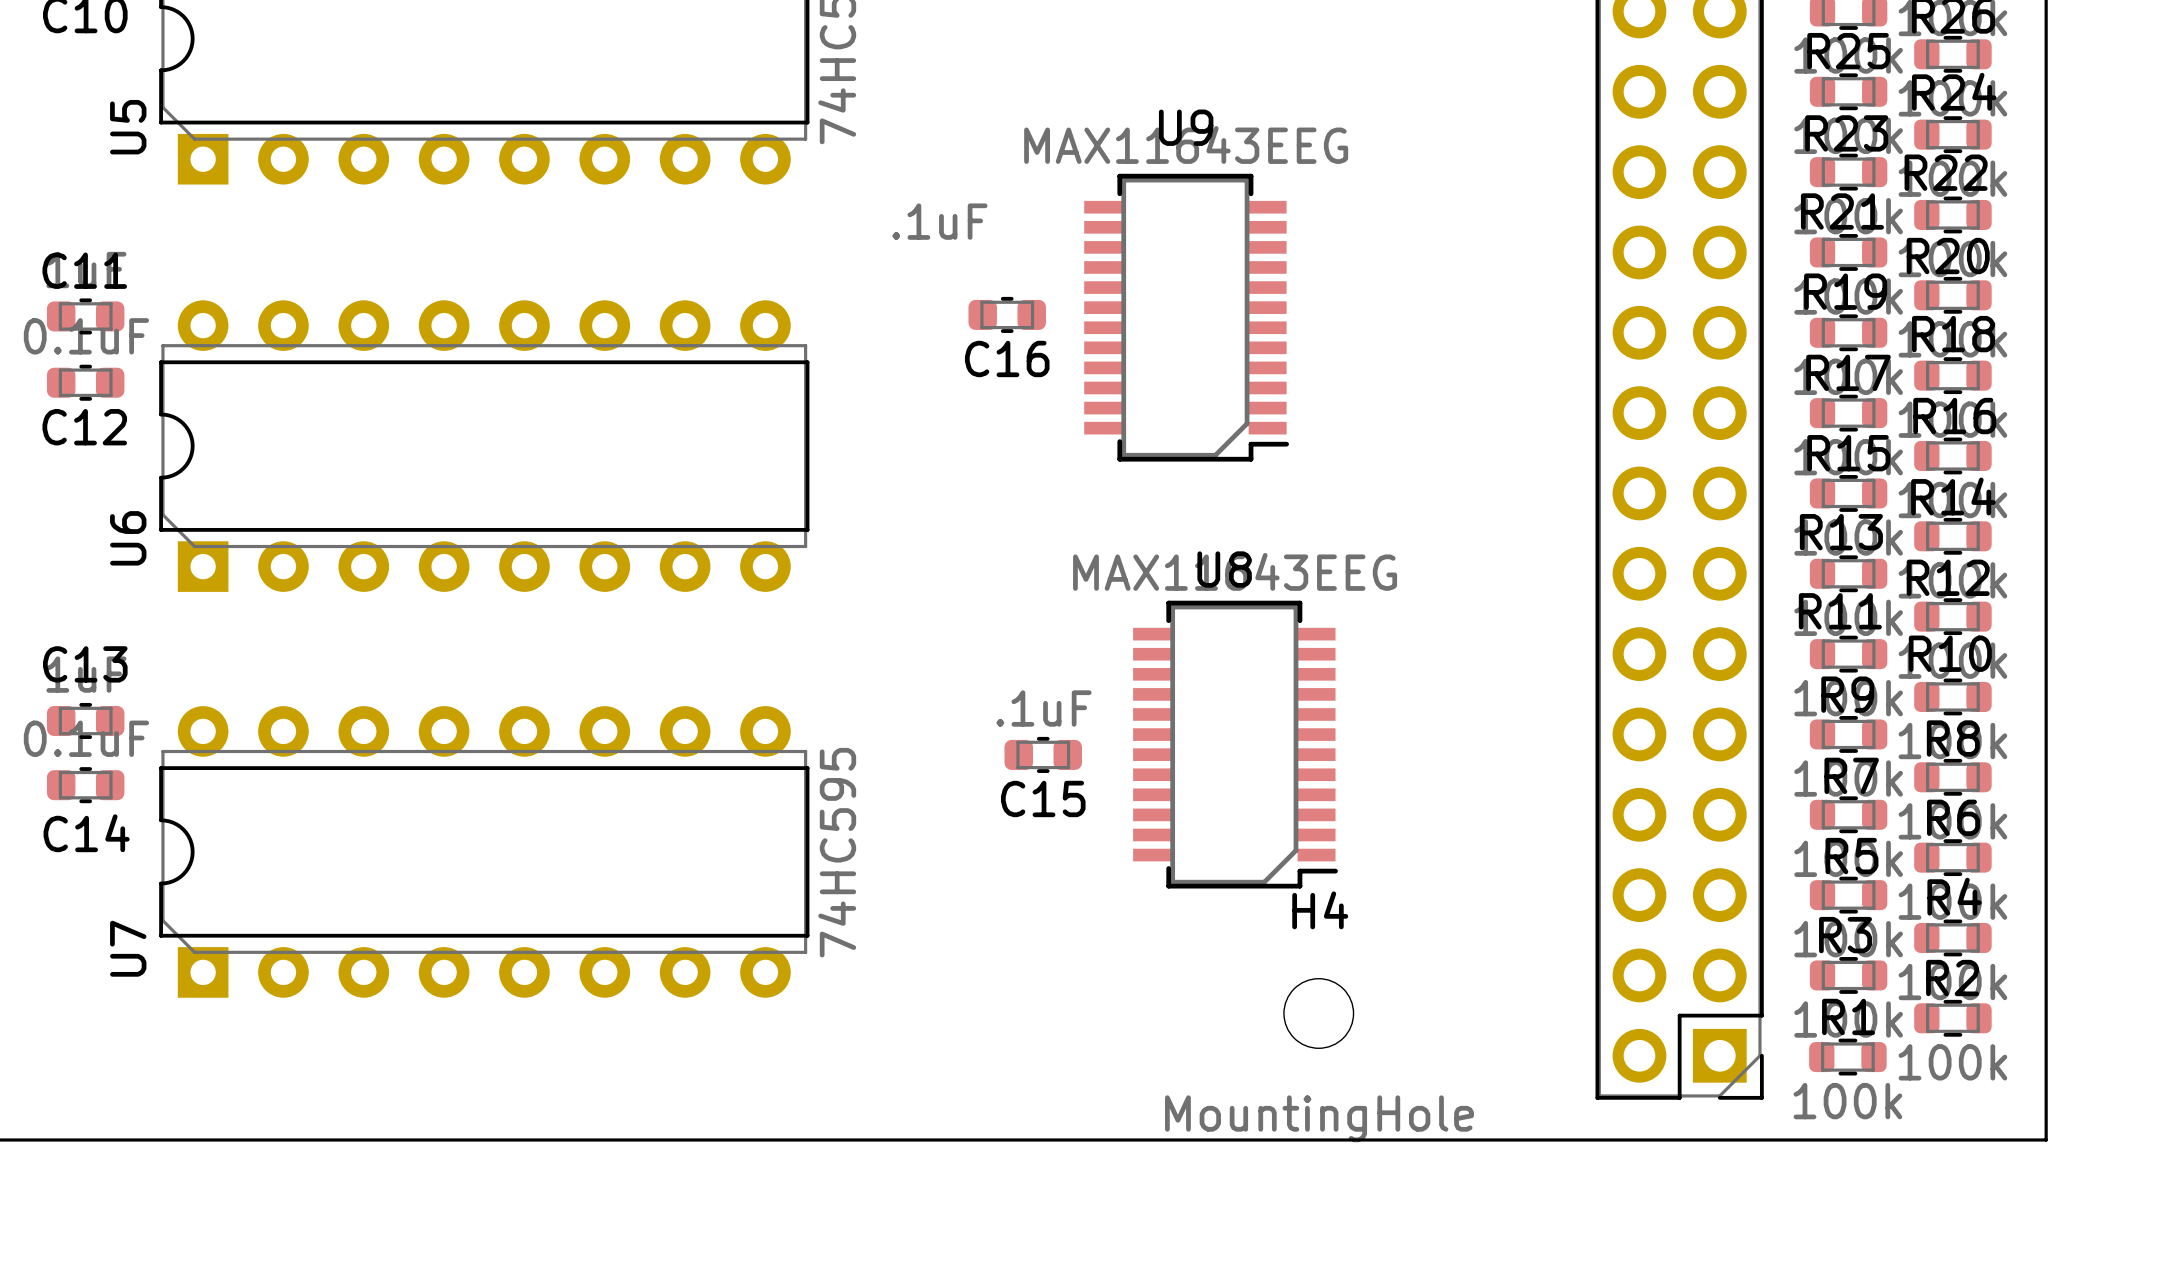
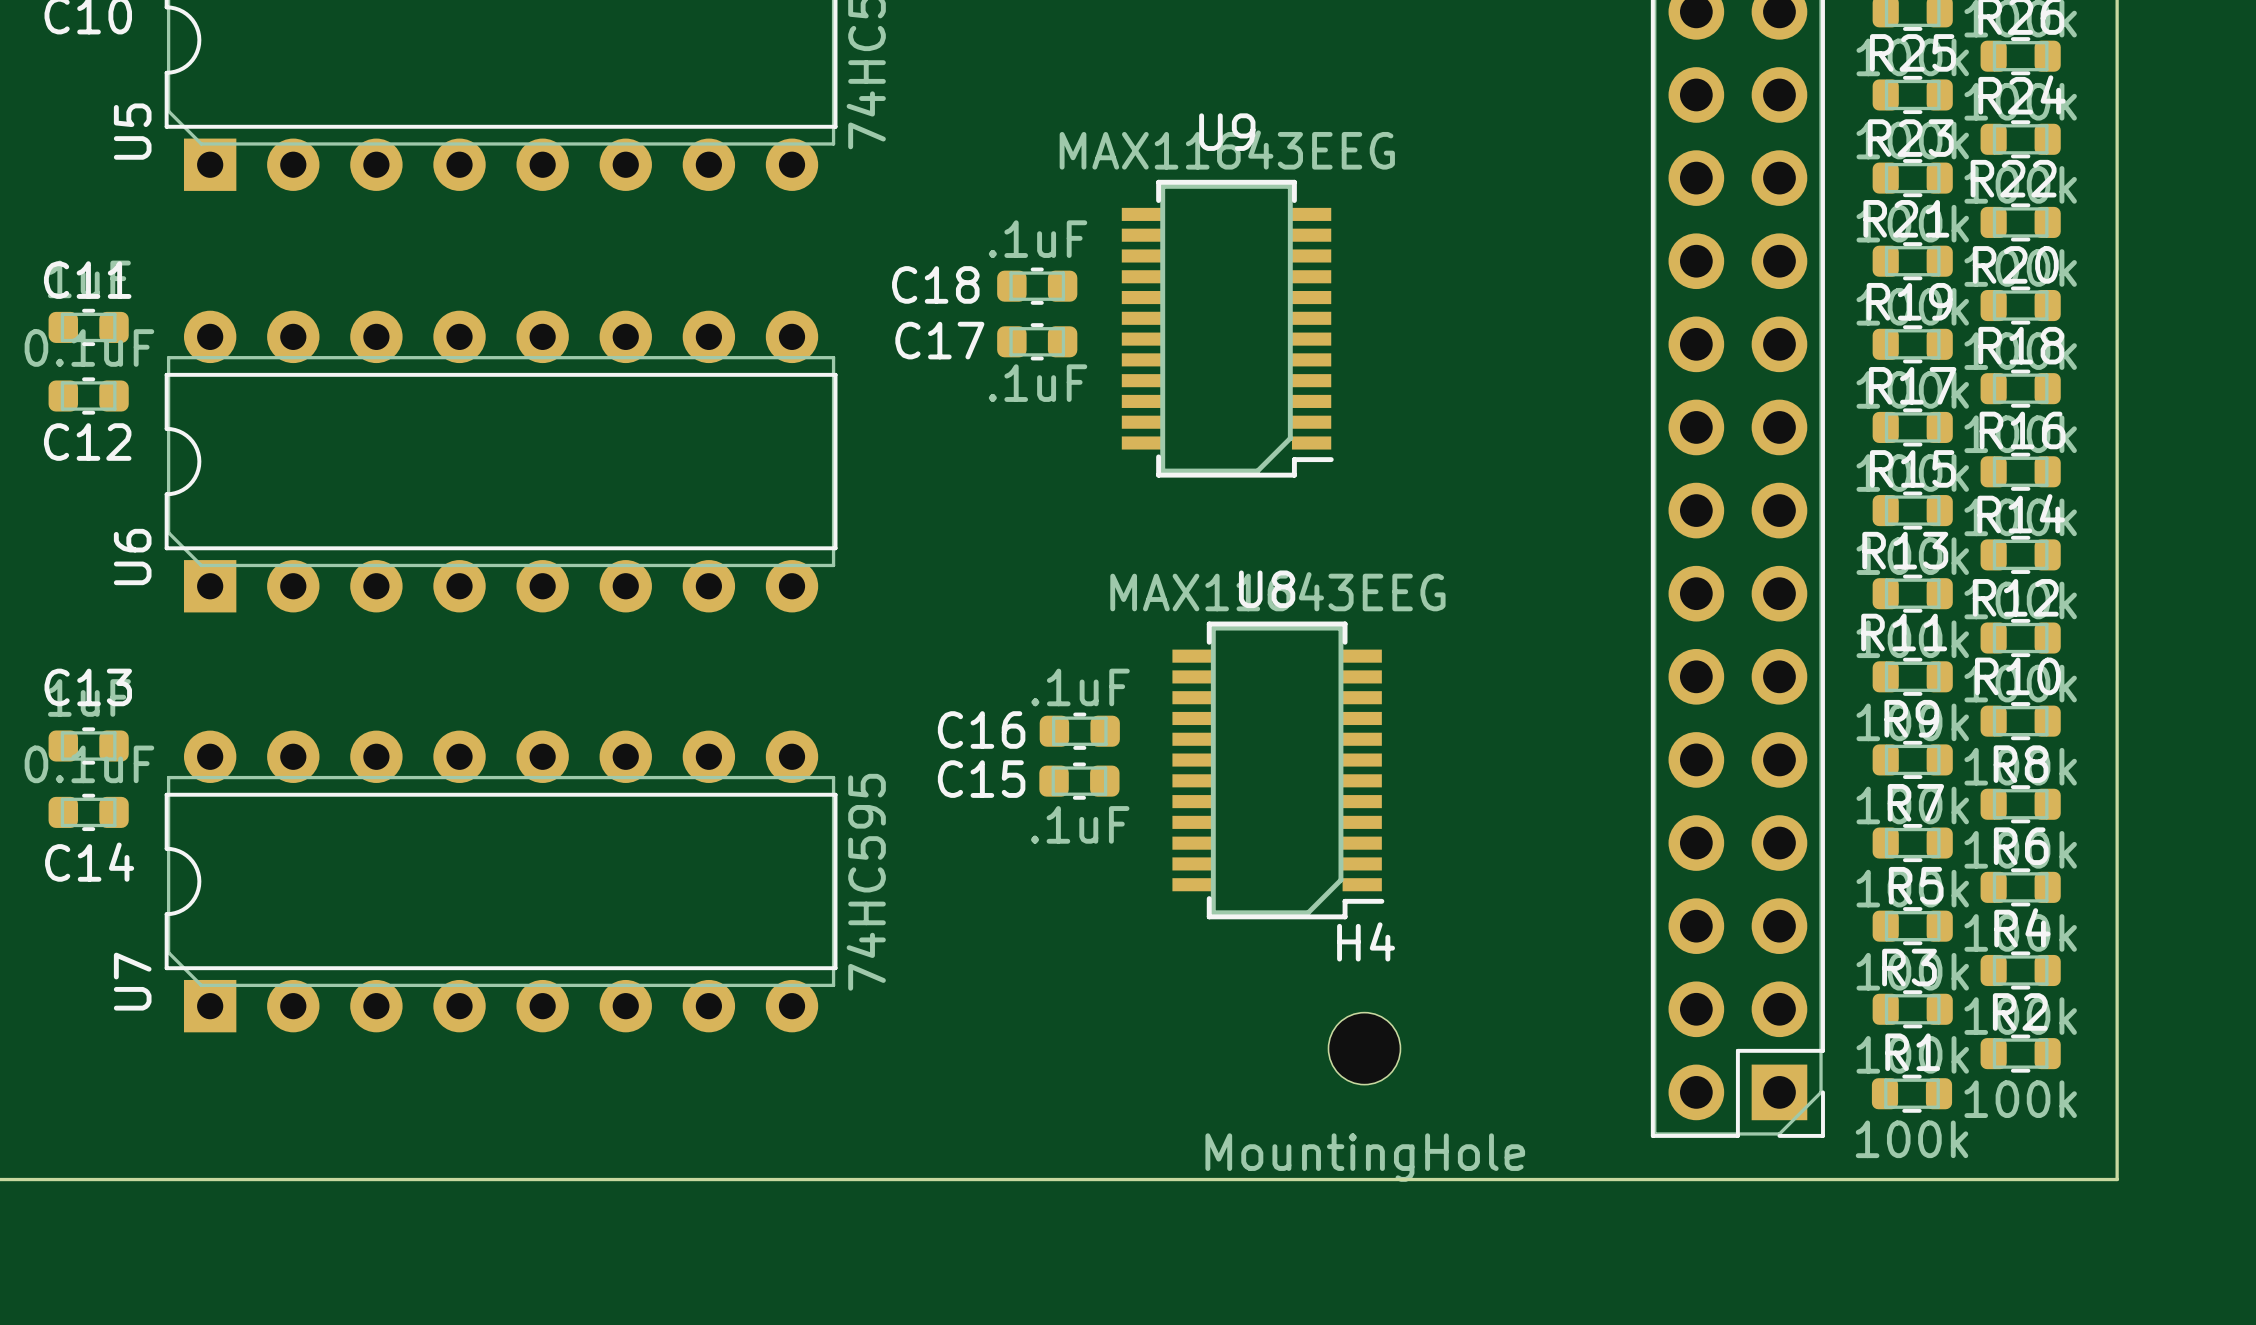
C16 value position: .1uF (939, 221) -> .1uF (1080, 687)
C18: none -> .1uF (1037, 286)
C16 position: (1007, 314) -> (1079, 731)
C17: none -> .1uF (1037, 341)
C16 name position: C16 (1007, 358) -> C16 (981, 729)
C15 value position: .1uF (1044, 708) -> .1uF (1080, 824)
C15 name position: C15 (1043, 798) -> C15 (981, 779)

